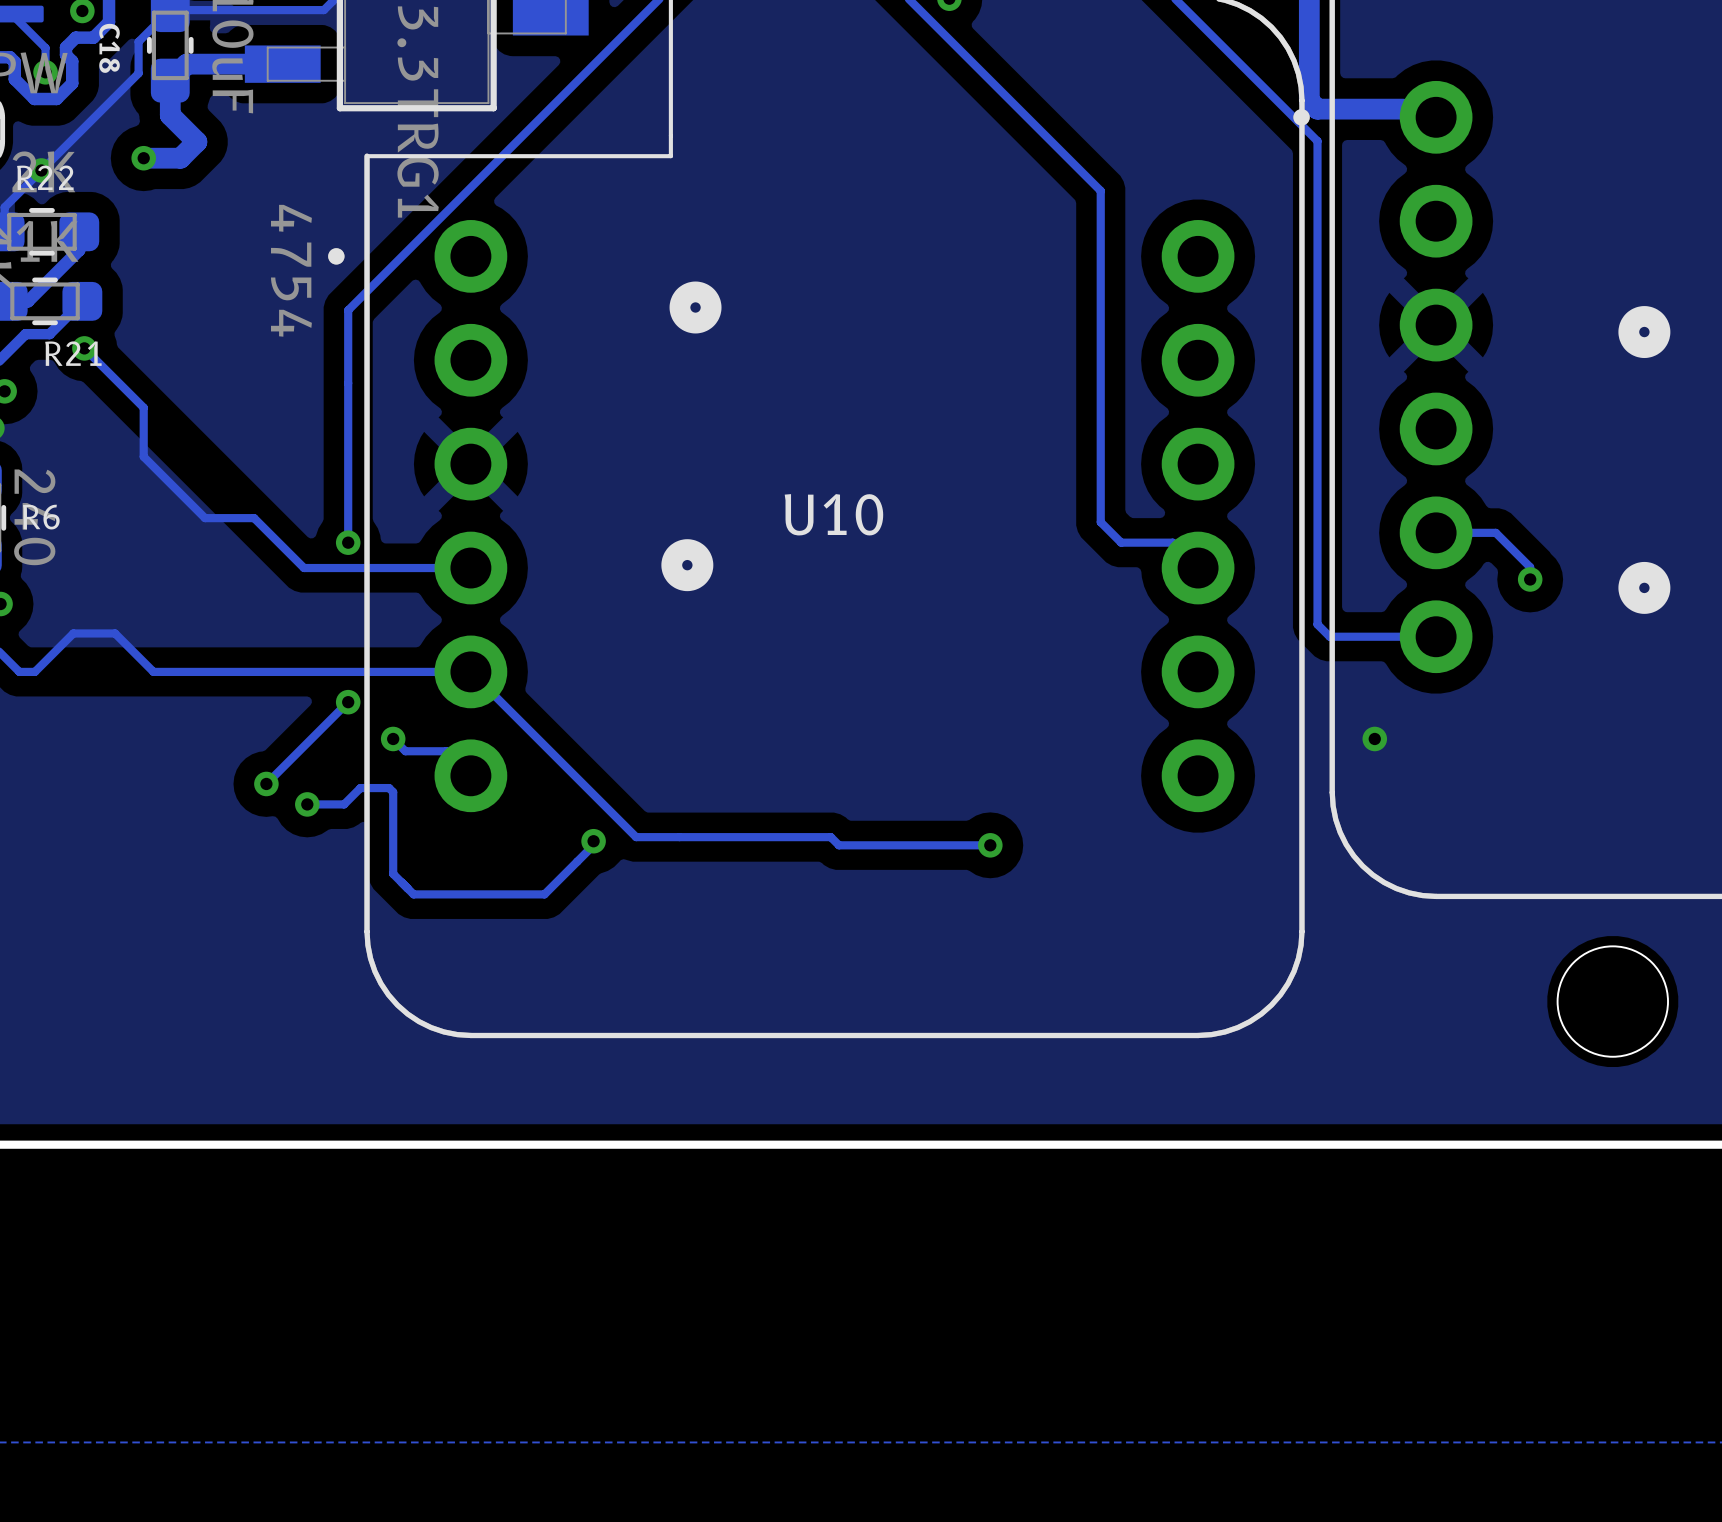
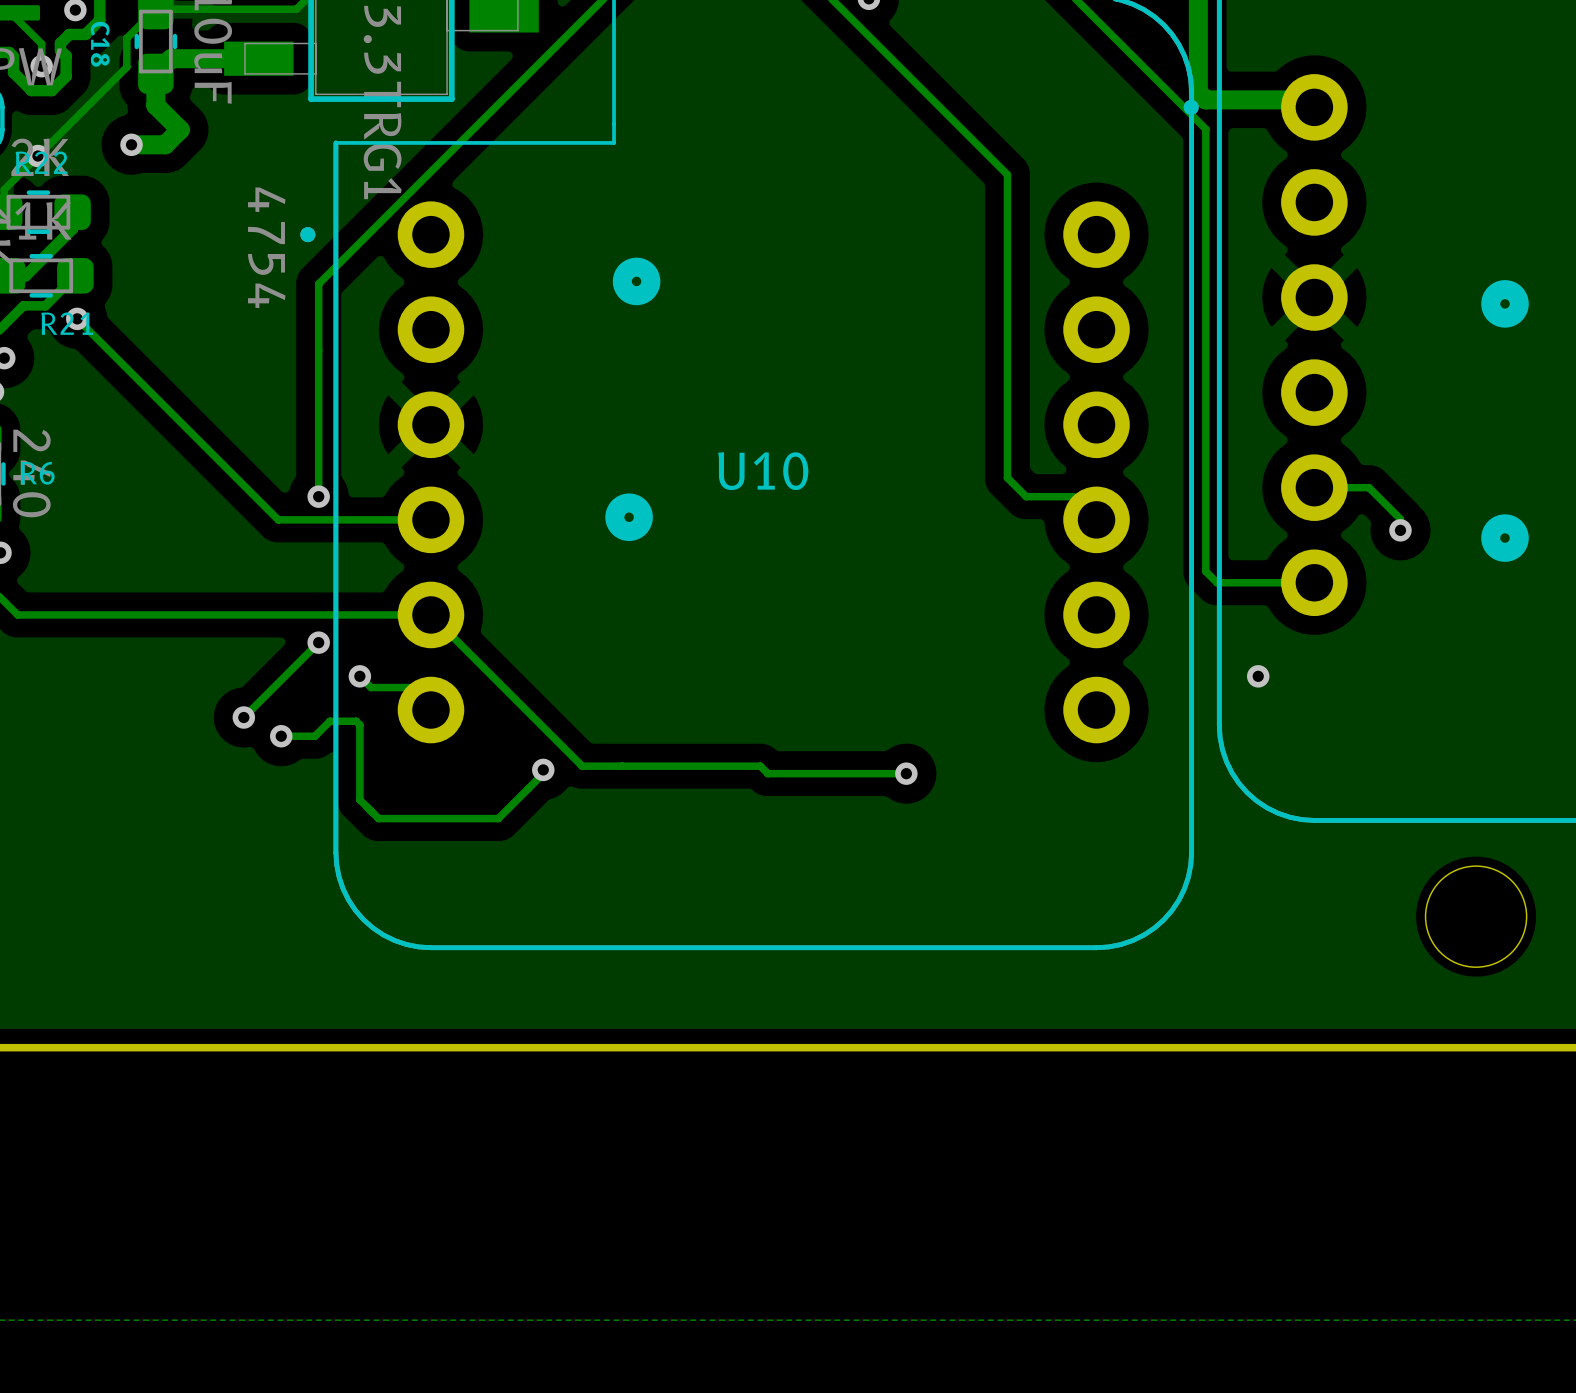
track: (143, 407) (143, 456) (205, 518) (254, 518) -> (131, 373) (232, 474)
track: (153, 671) (115, 633) (73, 633) (34, 671) -> (140, 614) (31, 614)

